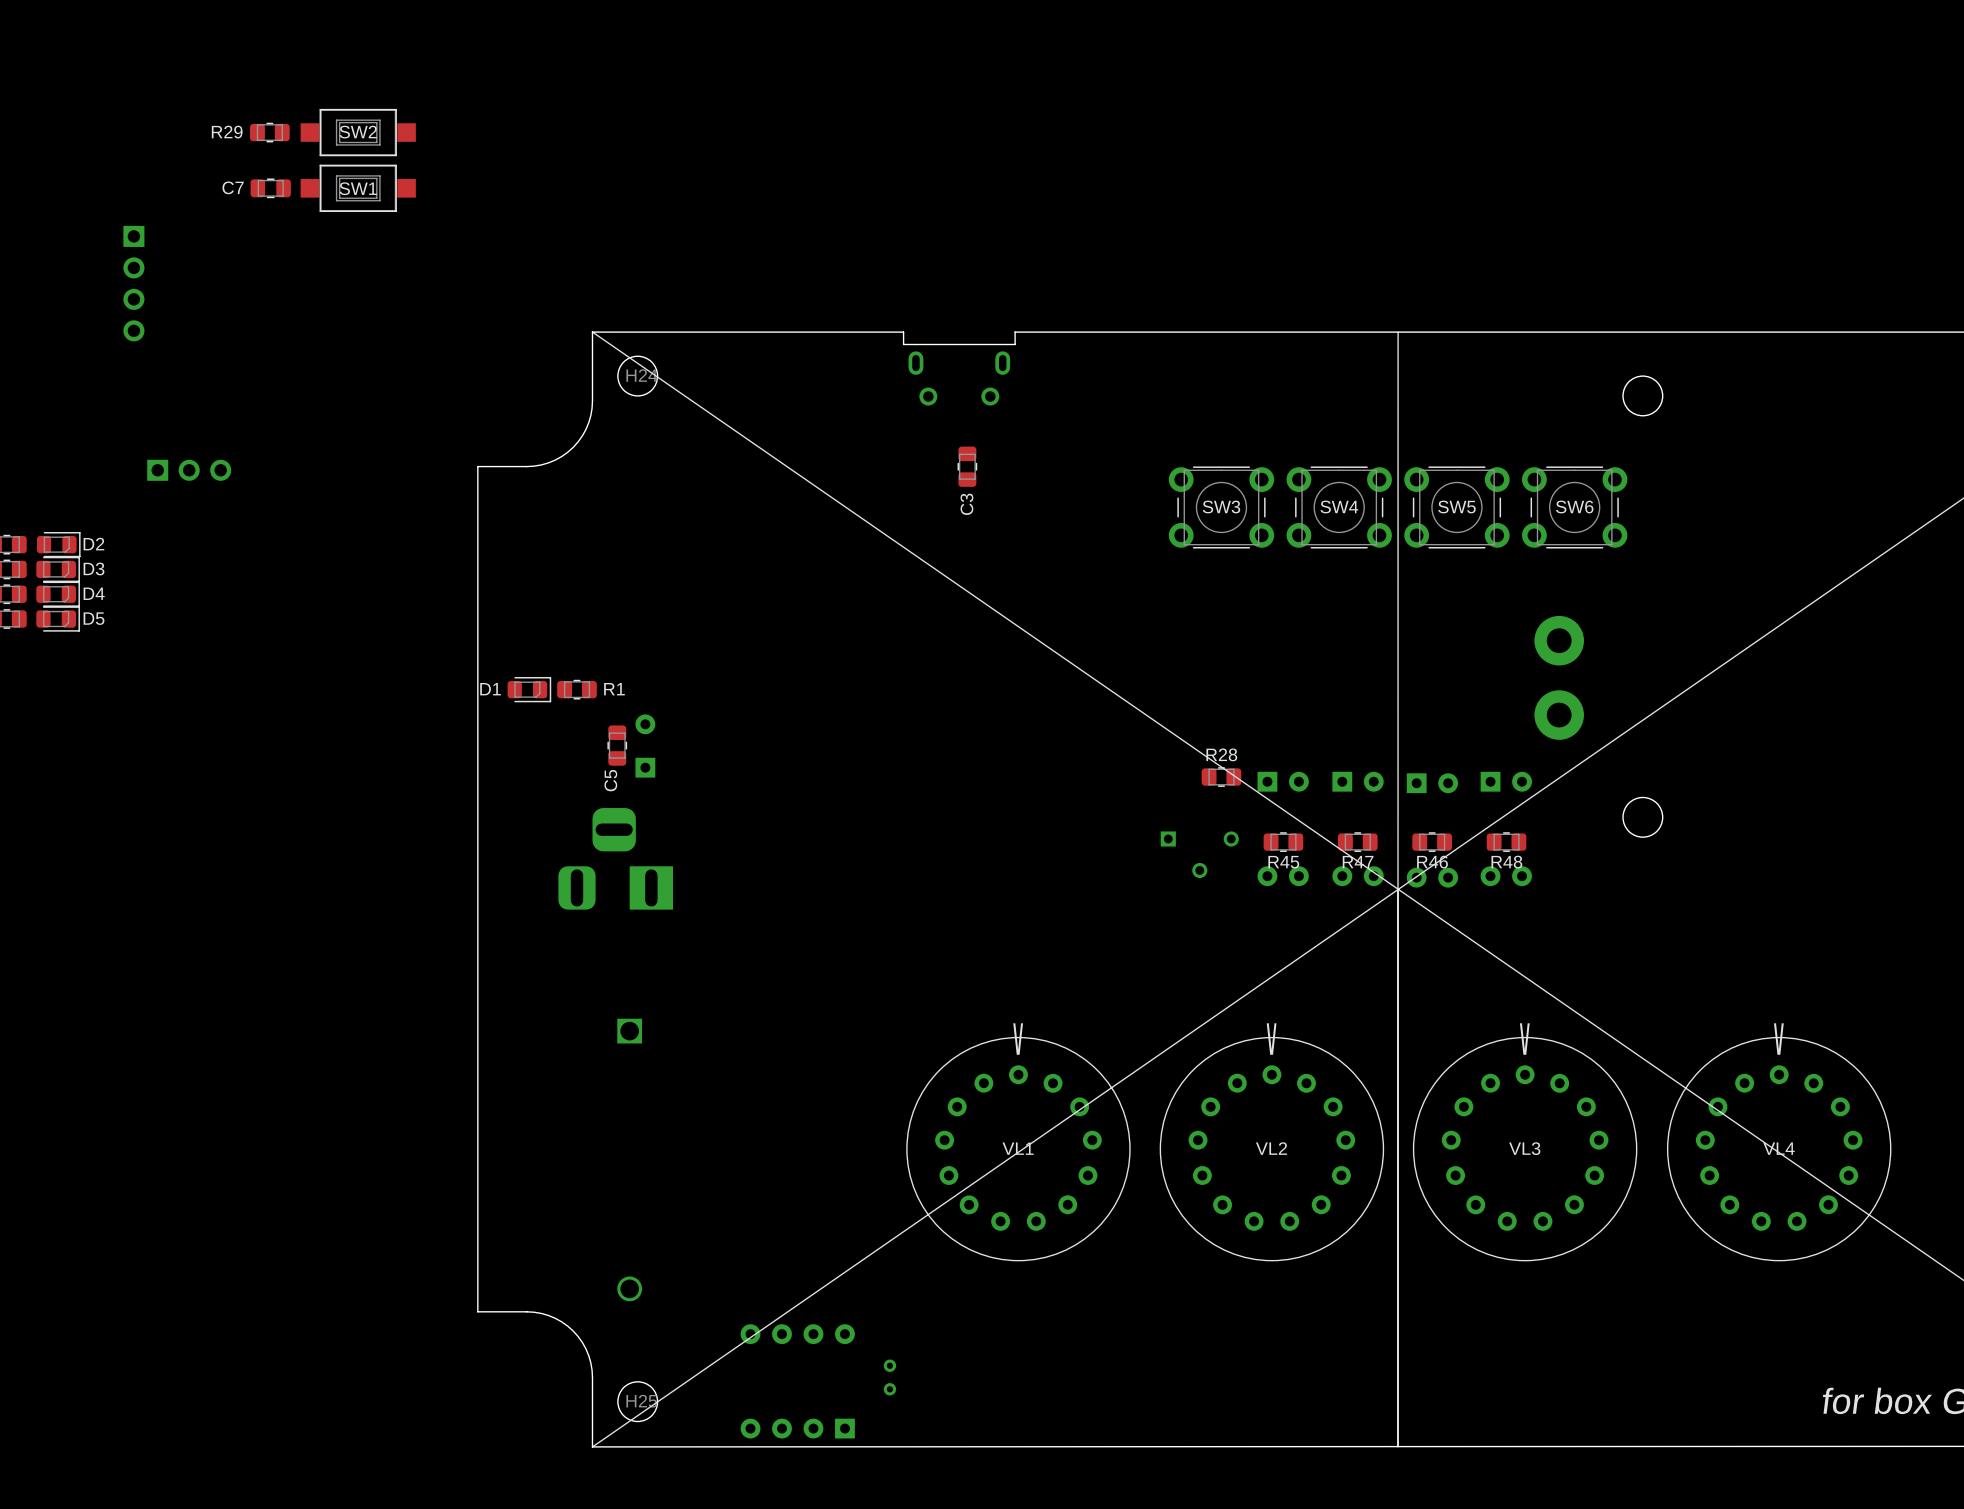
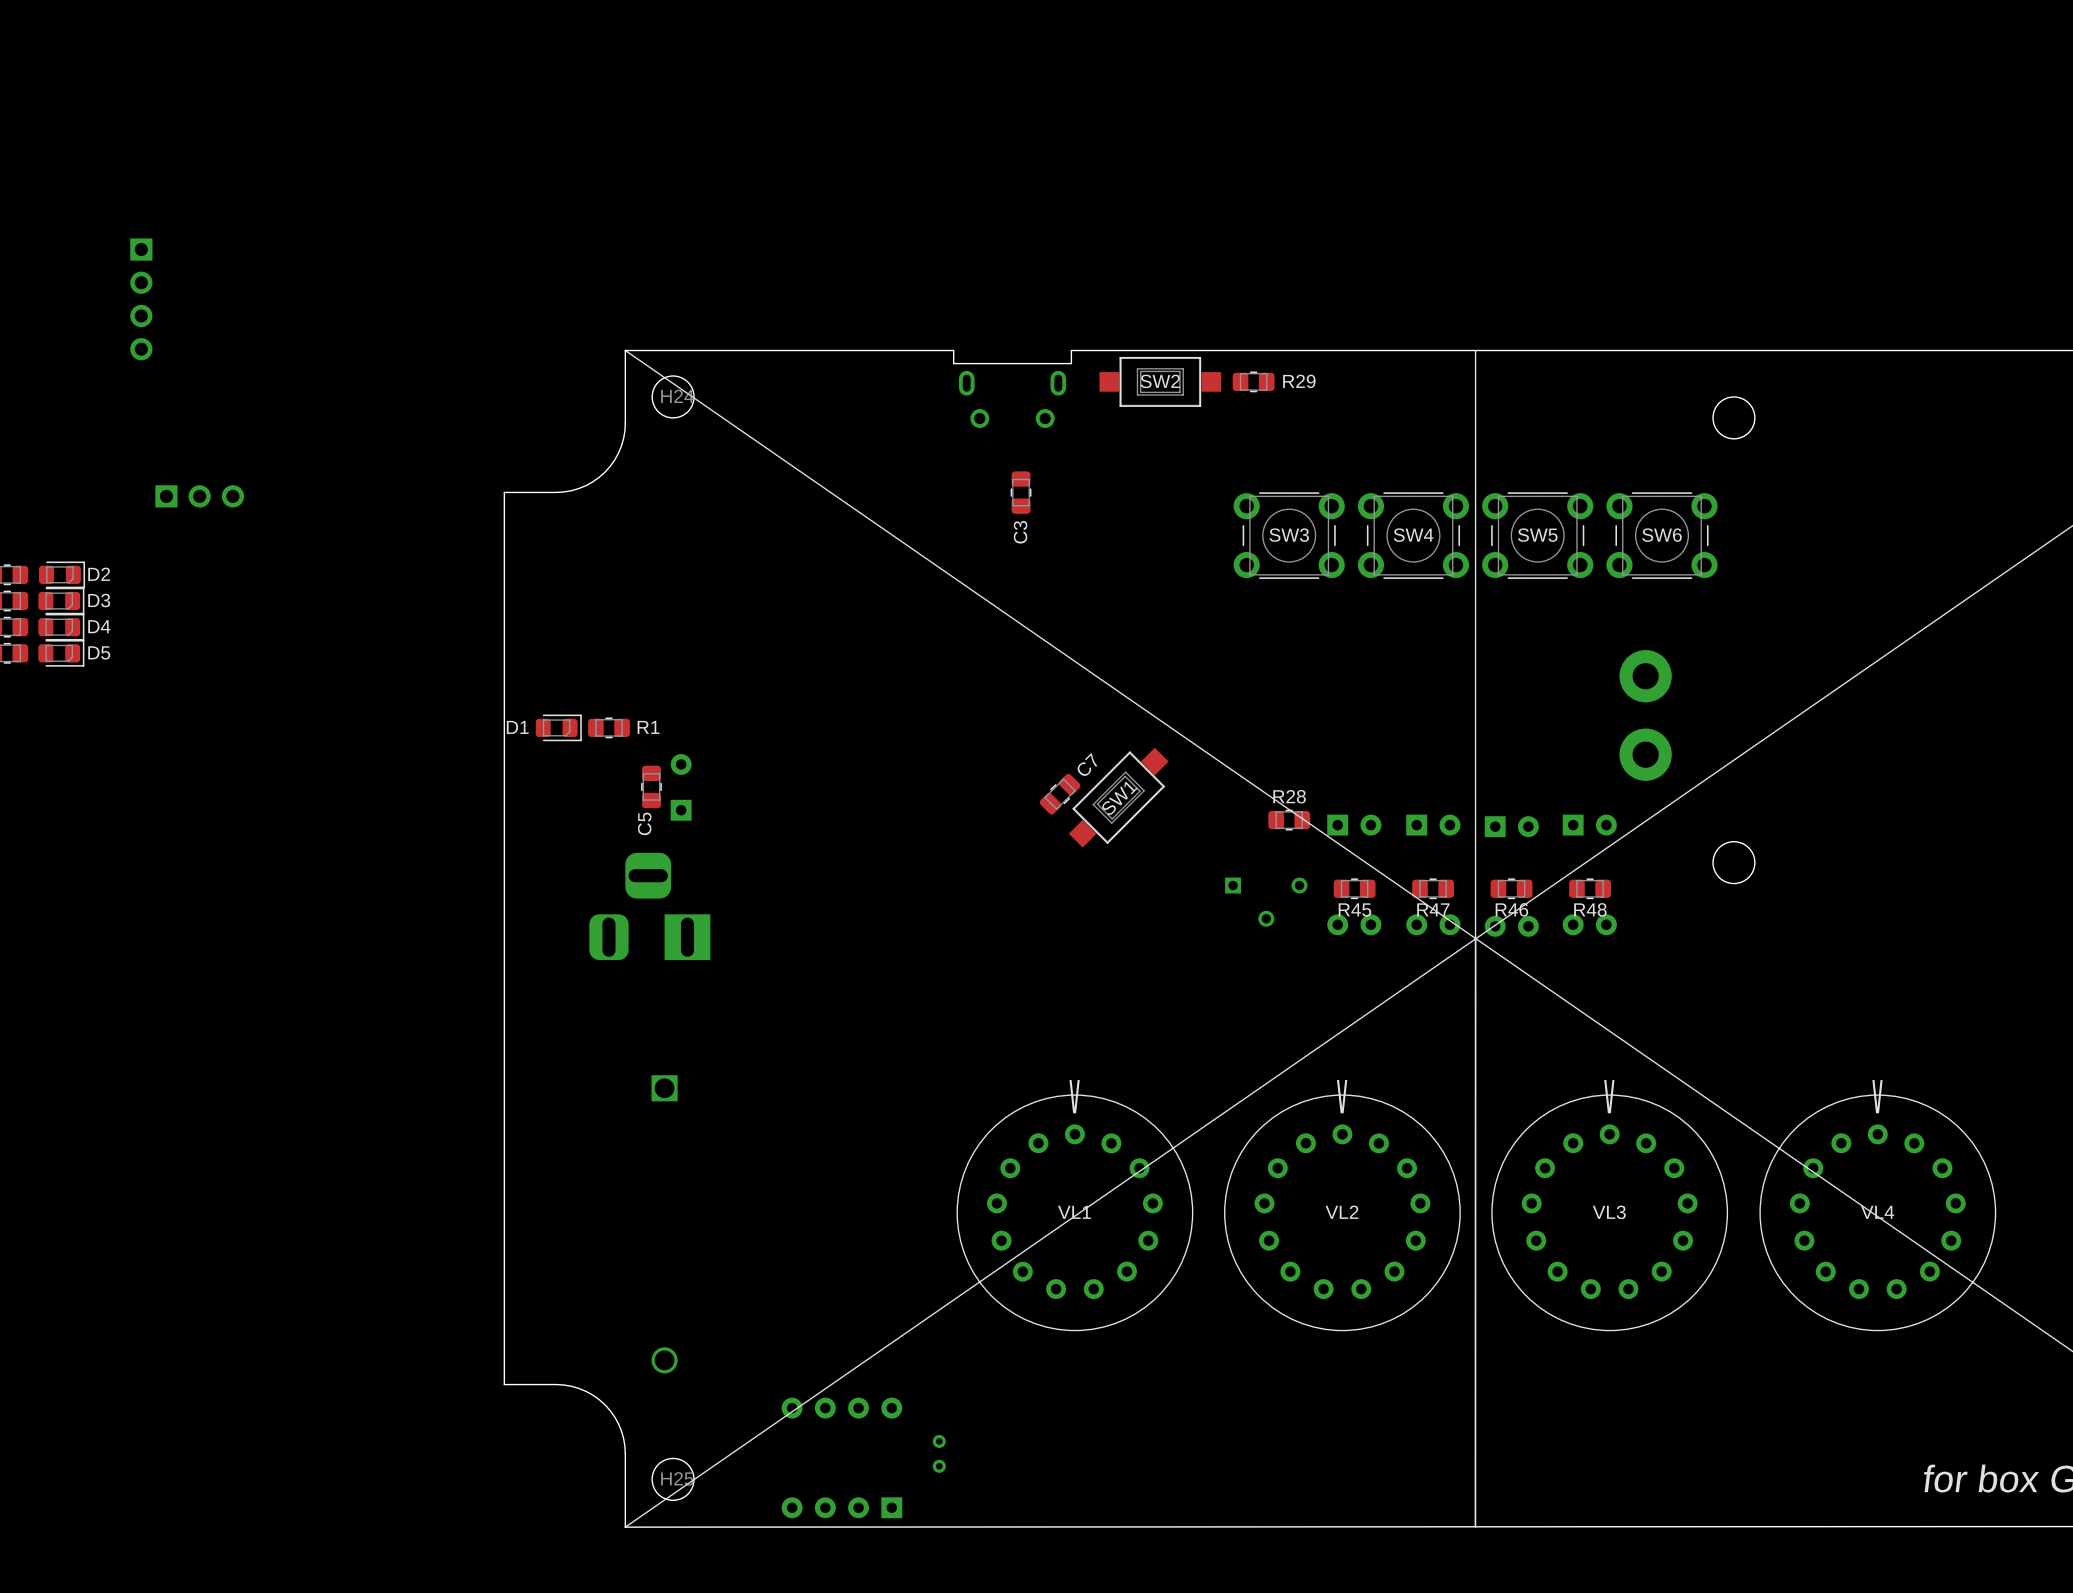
R29 name position: R29 (227, 132) -> R29 (1299, 381)
R29 position: (269, 132) -> (1253, 381)
SW2 position: (358, 132) -> (1160, 381)
C7 name position: C7 (233, 187) -> C7 (1087, 764)
C7 rotation: 0° (270, 188) -> 45° counterclockwise (1060, 794)
C7 position: (270, 188) -> (1060, 794)
SW1 rotation: 0° (358, 188) -> 45° counterclockwise (1118, 797)
SW1 position: (358, 188) -> (1118, 797)

